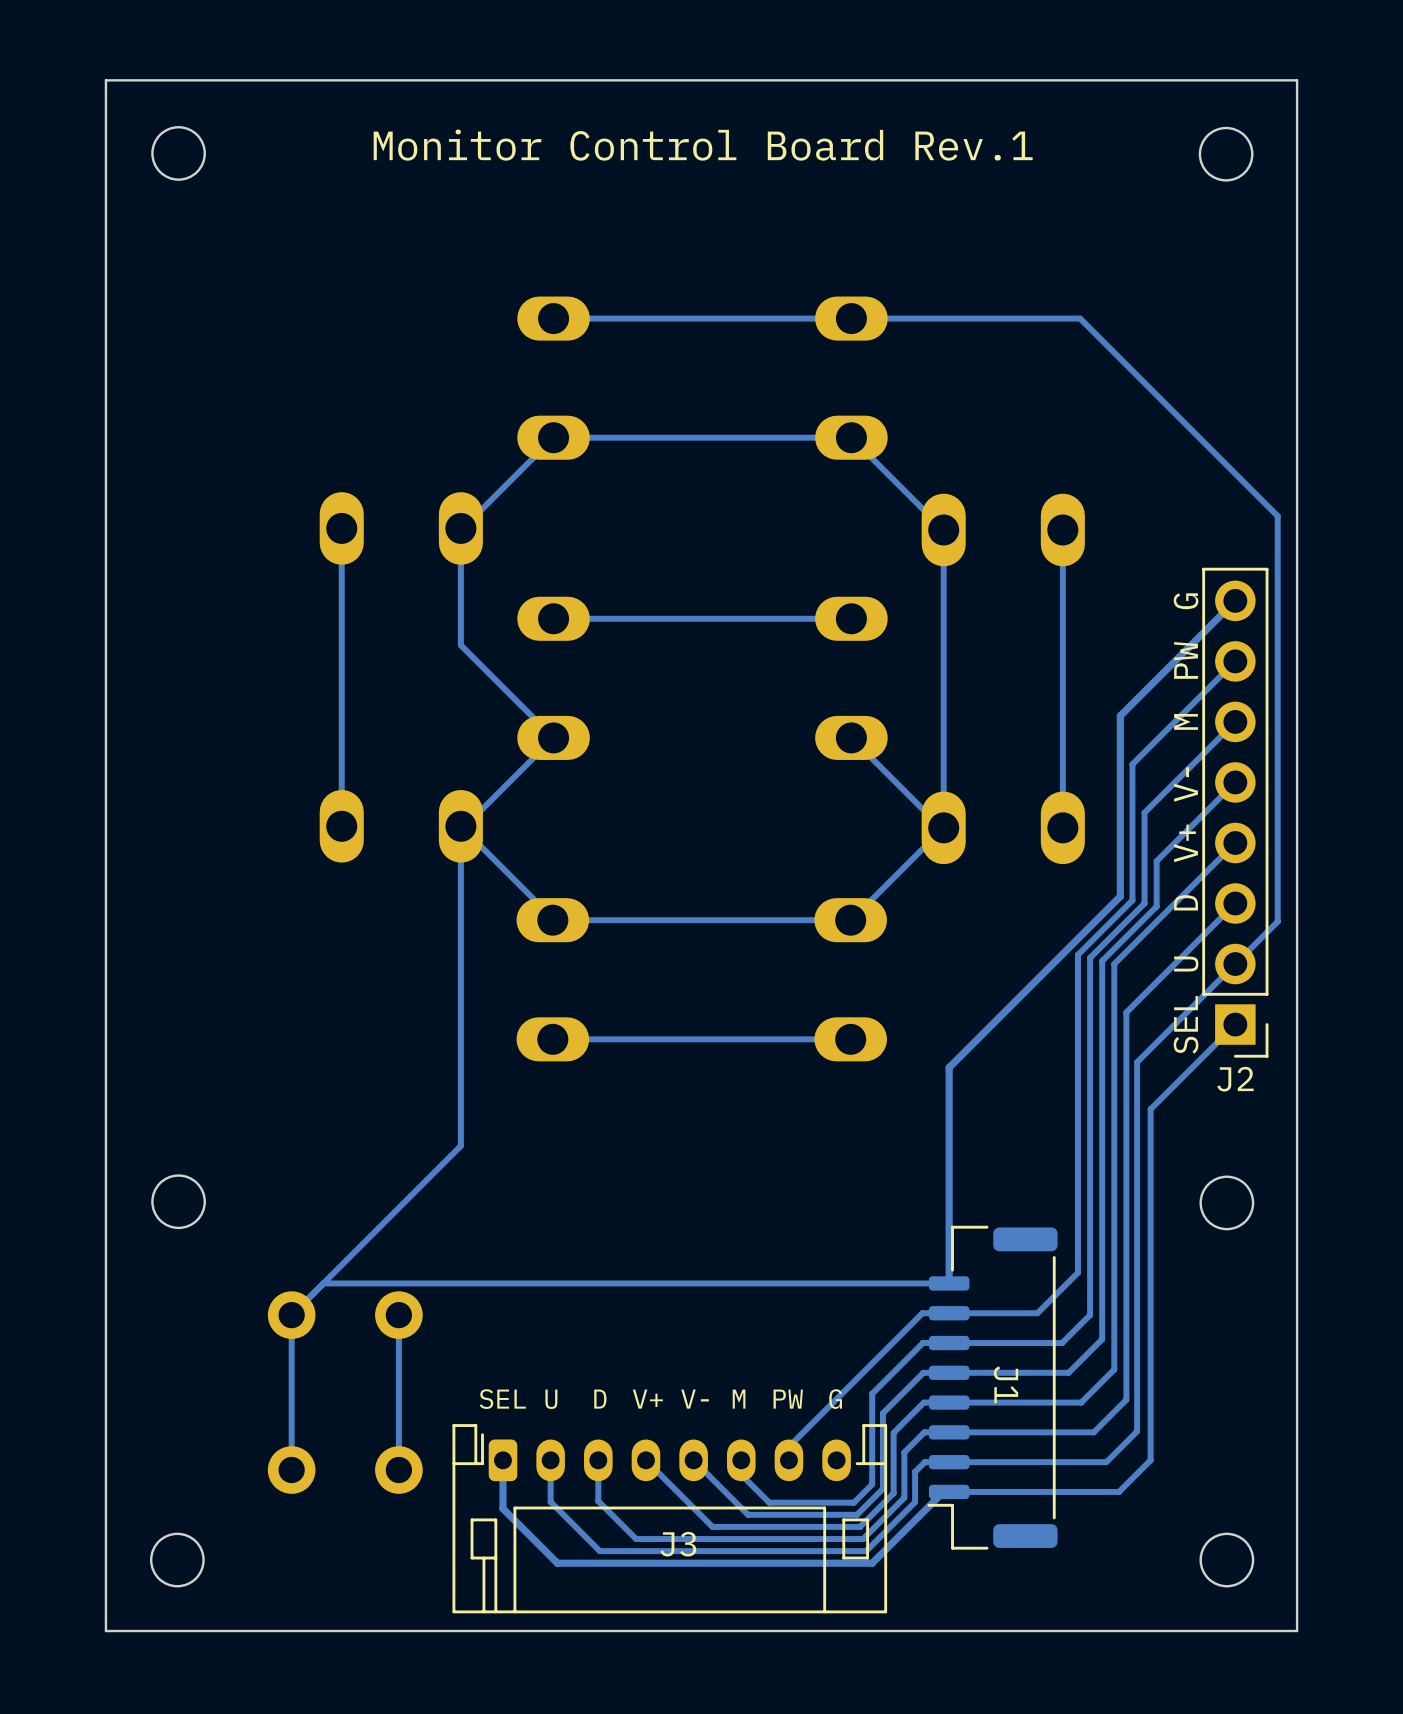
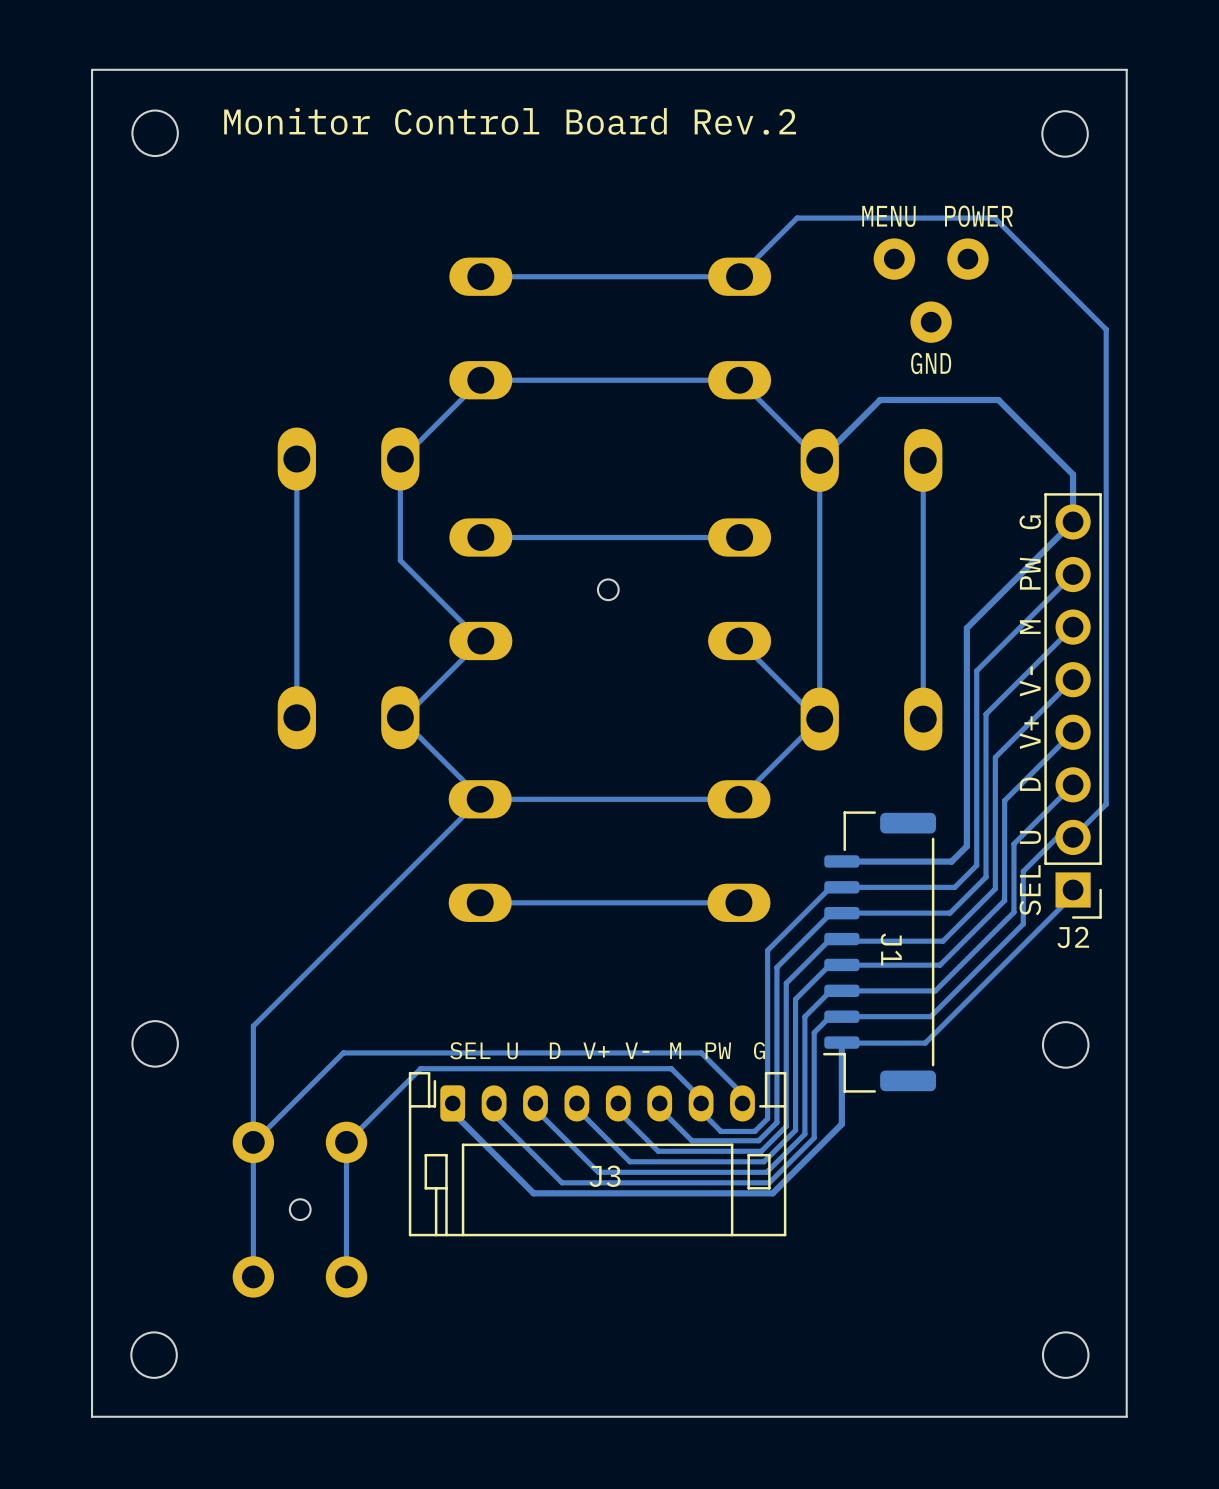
text: Monitor Control Board Rev.1 (703, 145) -> Monitor Control Board Rev.2 (510, 121)
text: none -> POWER (978, 216)
text: none -> MENU (888, 216)
part: none -> (894, 259)
part: none -> (967, 259)
track: (851, 318) (1080, 318) (1277, 516) (1277, 921) (1273, 925) -> (739, 276) (797, 218) (994, 218) (1106, 329) (1106, 804)
part: none -> (931, 322)
text: none -> GND (931, 363)
track: none -> (819, 460) (880, 399) (998, 399) (1073, 474) (1073, 521)
round board edge: none -> [596, 578, 620, 602]
track: (1120, 715) (1120, 896) (949, 1067) (949, 1283) (323, 1283) -> (973, 621) (966, 628) (966, 846) (951, 861) (841, 861)
track: (1132, 764) (1132, 900) (1077, 954) (1077, 1272) (1037, 1313) (922, 1313) (788, 1446) (788, 1460) -> (983, 663) (976, 670) (976, 865) (954, 887) (841, 887)
track: (1144, 812) (1144, 903) (1090, 957) (1090, 1315) (1062, 1343) (922, 1343) (872, 1393) (872, 1484) (853, 1502) (769, 1502) (741, 1474) (741, 1460) -> (994, 705) (986, 714) (986, 877) (950, 913) (831, 913) (776, 967) (776, 1122) (758, 1140) (691, 1140) (659, 1108) (659, 1103)
track: (460, 826) (460, 1145) (291, 1315) -> none
track: (1156, 861) (1156, 906) (1102, 960) (1102, 1339) (1068, 1372) (923, 1372) (882, 1413) (882, 1488) (856, 1514) (748, 1514) (693, 1460) -> (1004, 748) (995, 757) (995, 888) (943, 941) (843, 941) (841, 939) (830, 939) (786, 983) (786, 1126) (761, 1151) (658, 1151) (618, 1111) (618, 1103)
track: none -> (480, 799) (253, 1026) (253, 1142) (343, 1052) (701, 1052) (742, 1094) (742, 1103)
track: (1156, 921) (1114, 964) (1114, 1369) (1081, 1402) (923, 1402) (893, 1432) (893, 1493) (860, 1526) (712, 1526) (645, 1460) -> (1004, 800) (1004, 900) (940, 965) (842, 965)
track: (1235, 964) (1137, 1062) (1137, 1431) (1106, 1462) (924, 1462) (915, 1471) (915, 1502) (866, 1551) (599, 1551) (550, 1501) (550, 1460) -> (1073, 837) (1057, 837) (1023, 871) (1023, 924) (930, 1016) (830, 1016) (814, 1032) (814, 1137) (769, 1182) (562, 1182) (494, 1114) (494, 1103)
track: (1167, 971) (1126, 1012) (1126, 1399) (1093, 1432) (924, 1432) (904, 1452) (904, 1497) (863, 1539) (636, 1539) (598, 1501) (598, 1460) -> (1013, 843) (1013, 912) (935, 990) (841, 990)
track: none -> (841, 887) (830, 887) (767, 950) (767, 1118) (754, 1131) (720, 1131) (701, 1111) (701, 1098) (671, 1068) (420, 1068) (346, 1142)
track: (1235, 1024) (1150, 1109) (1150, 1460) (1118, 1491) (943, 1491) (872, 1563) (557, 1563) (502, 1508) (502, 1460) -> (1073, 889) (1073, 895) (925, 1043) (841, 1042) (841, 1124) (772, 1193) (533, 1193) (452, 1112) (452, 1103)
track: none -> (841, 964) (829, 964) (795, 999) (795, 1130) (764, 1161) (629, 1161) (576, 1108) (576, 1103)
track: none -> (841, 990) (830, 990) (804, 1016) (804, 1134) (766, 1172) (598, 1172) (535, 1109) (535, 1103)
round board edge: none -> [288, 1198, 312, 1222]
J1 position: (992, 1387) -> (879, 952)
text position: SEL (502, 1399) -> SEL (470, 1050)
text position: U (551, 1399) -> U (512, 1050)
text position: D (600, 1399) -> D (555, 1050)
text position: V+ (647, 1399) -> V+ (596, 1050)
text position: V- (695, 1399) -> V- (637, 1050)
text position: M (739, 1399) -> M (675, 1050)
text position: PW (788, 1399) -> PW (718, 1050)
text position: G (835, 1399) -> G (759, 1050)
J3 position: (669, 1518) -> (597, 1154)

